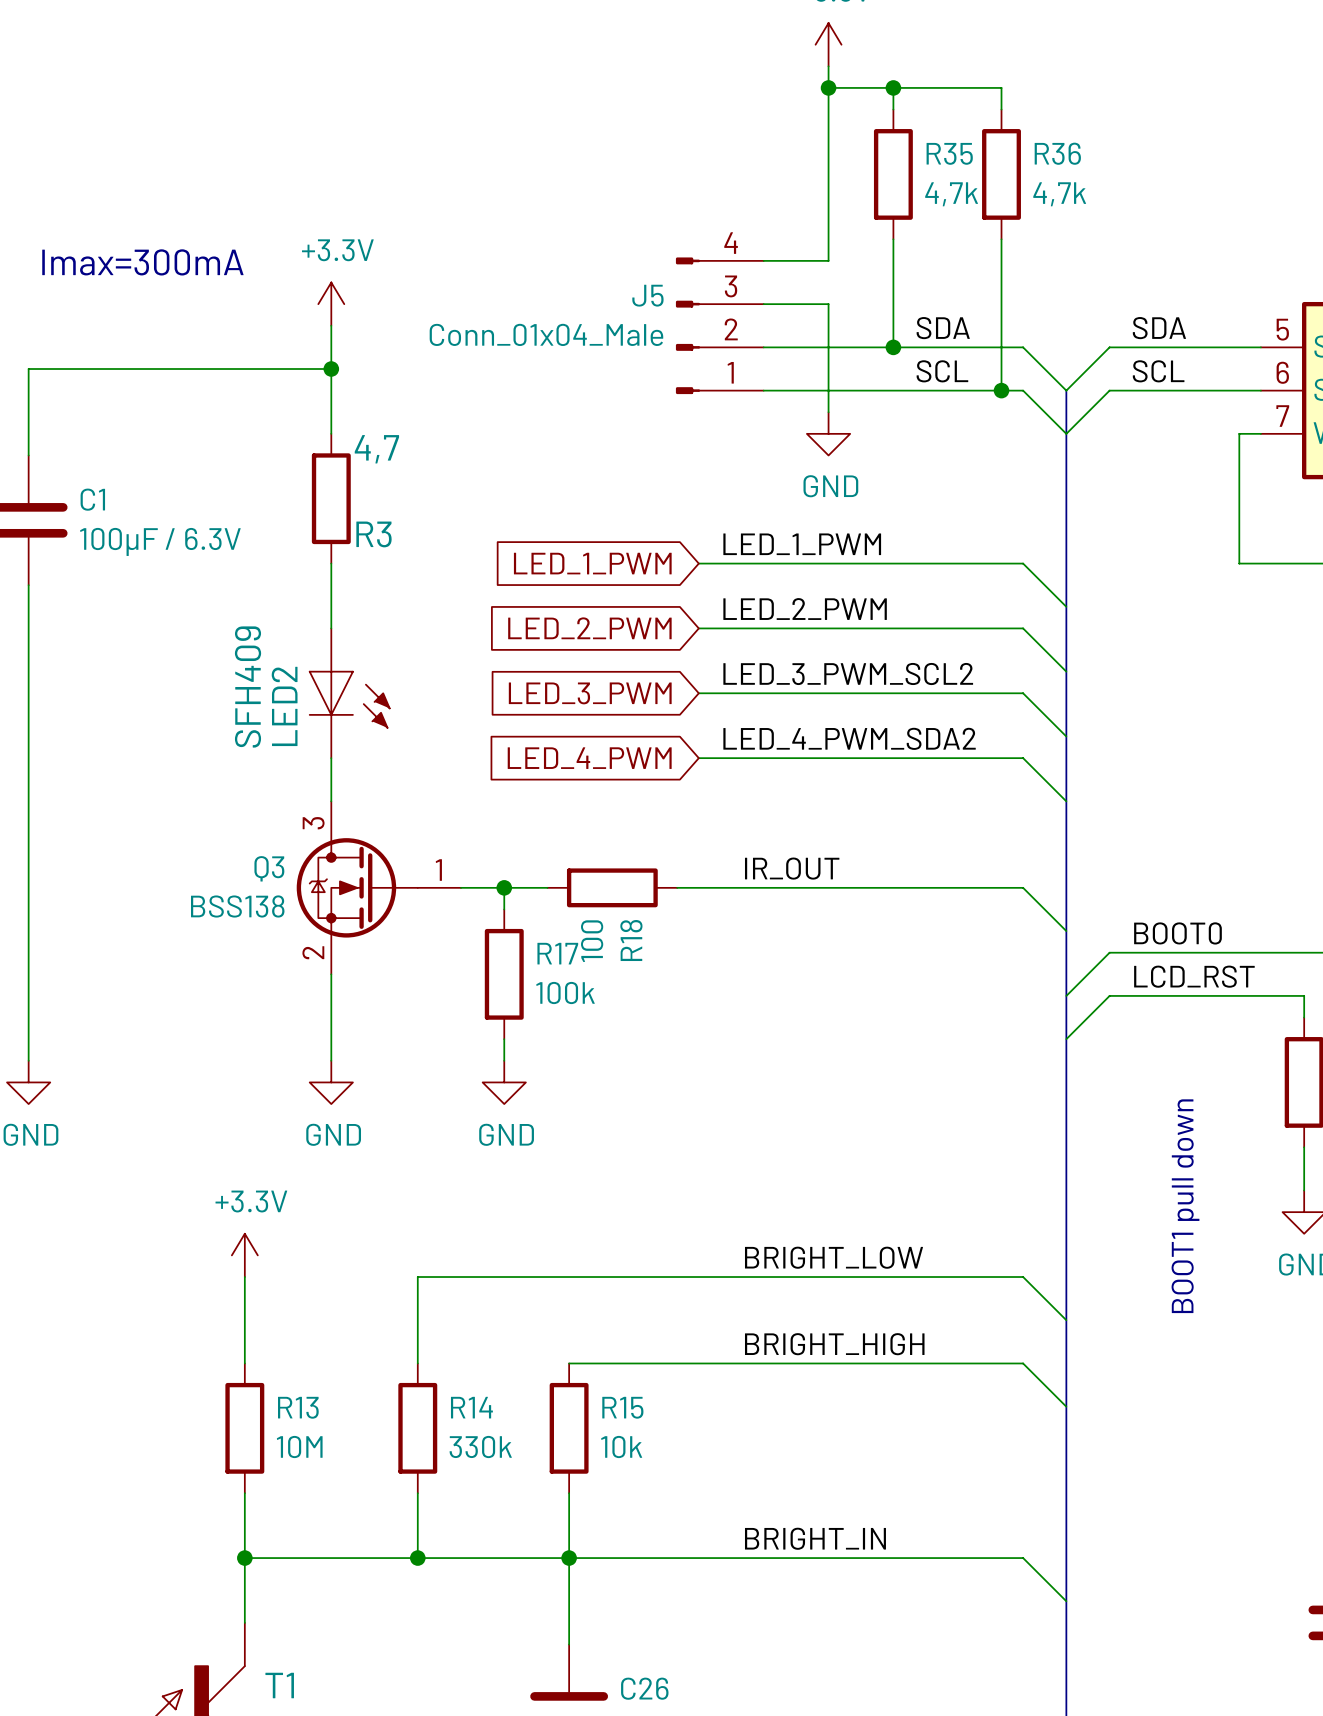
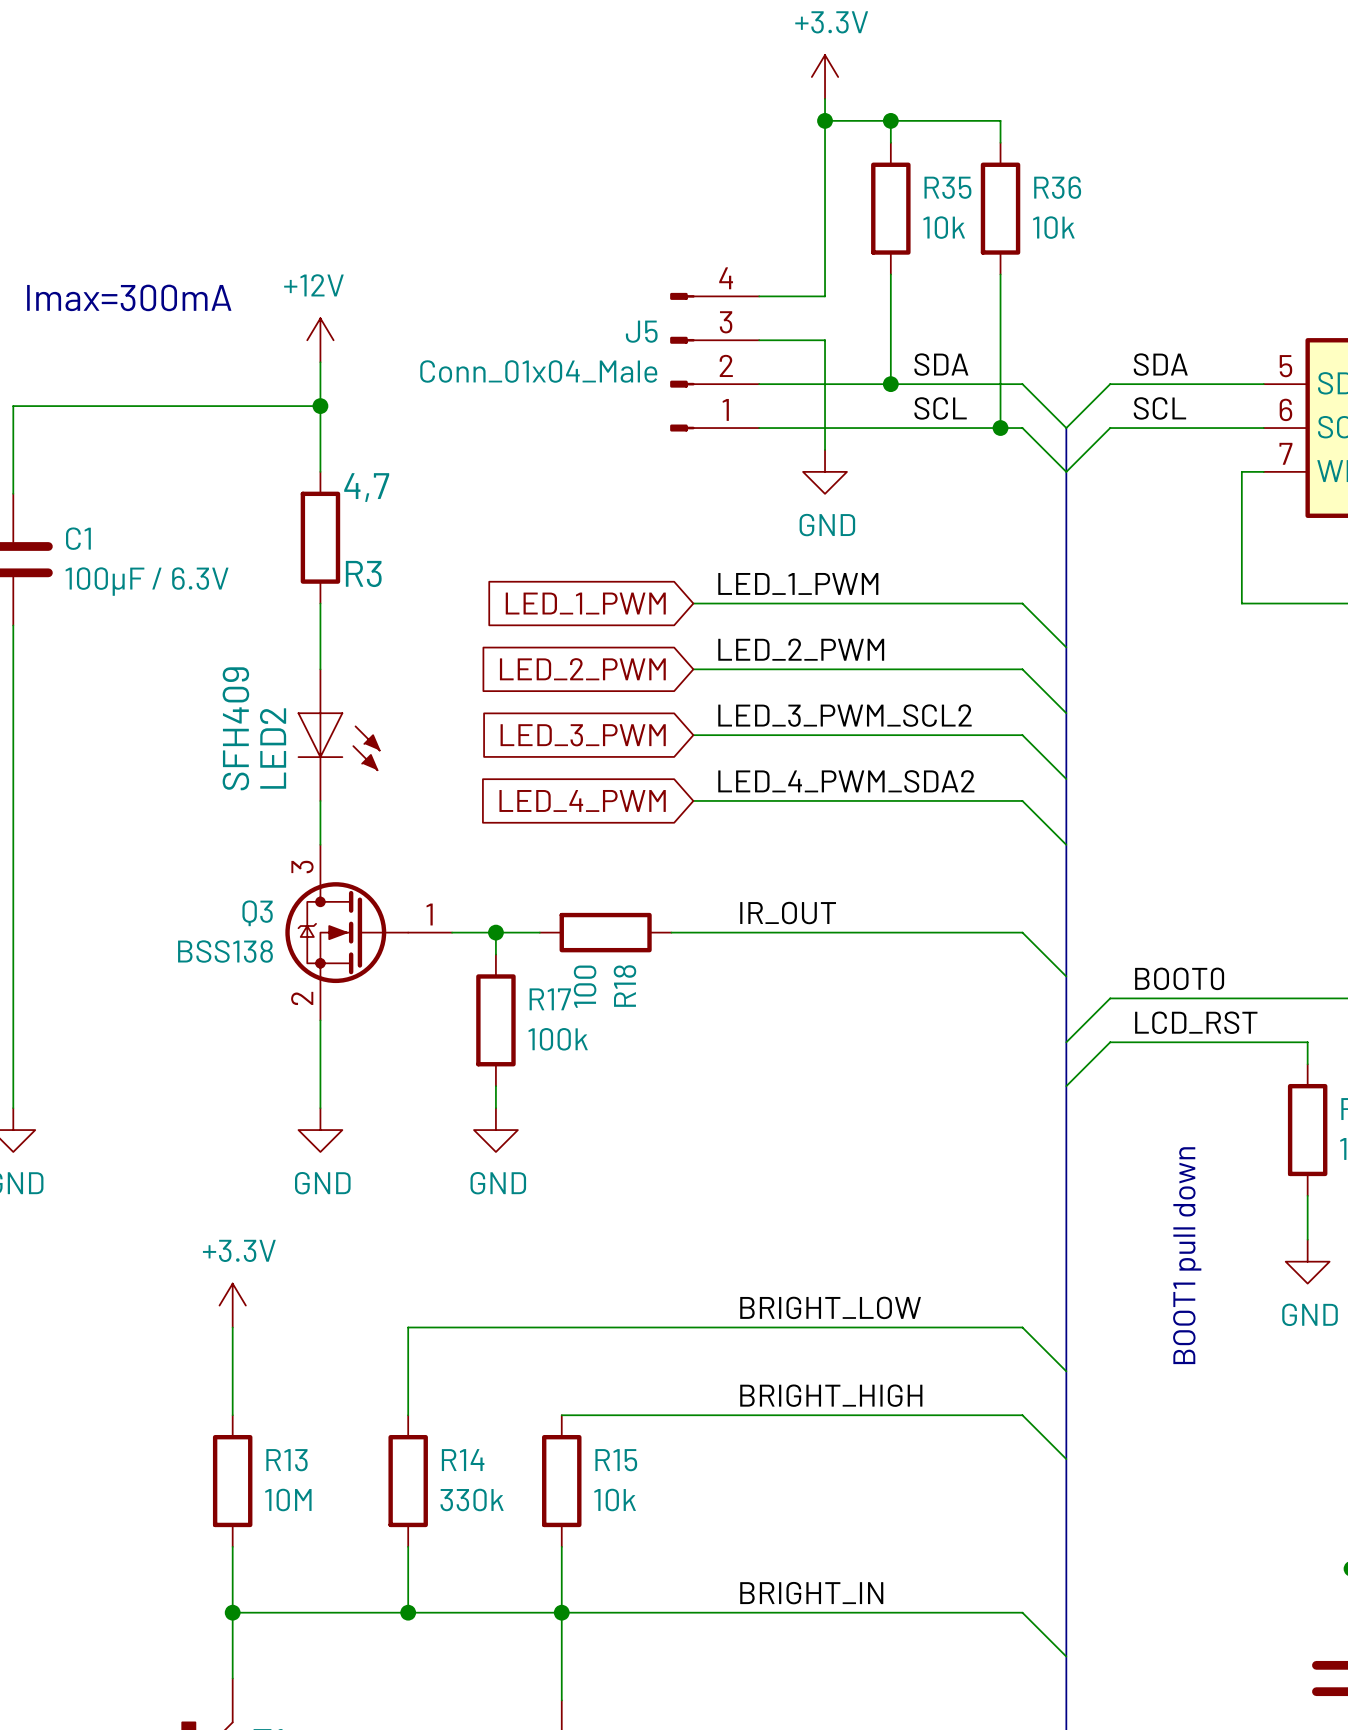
R35 value: 4,7k (951, 194) -> 10k (944, 227)
R36 value: 4,7k (1059, 194) -> 10k (1053, 227)
power symbol: +3.3V (331, 304) -> +12V (320, 340)

